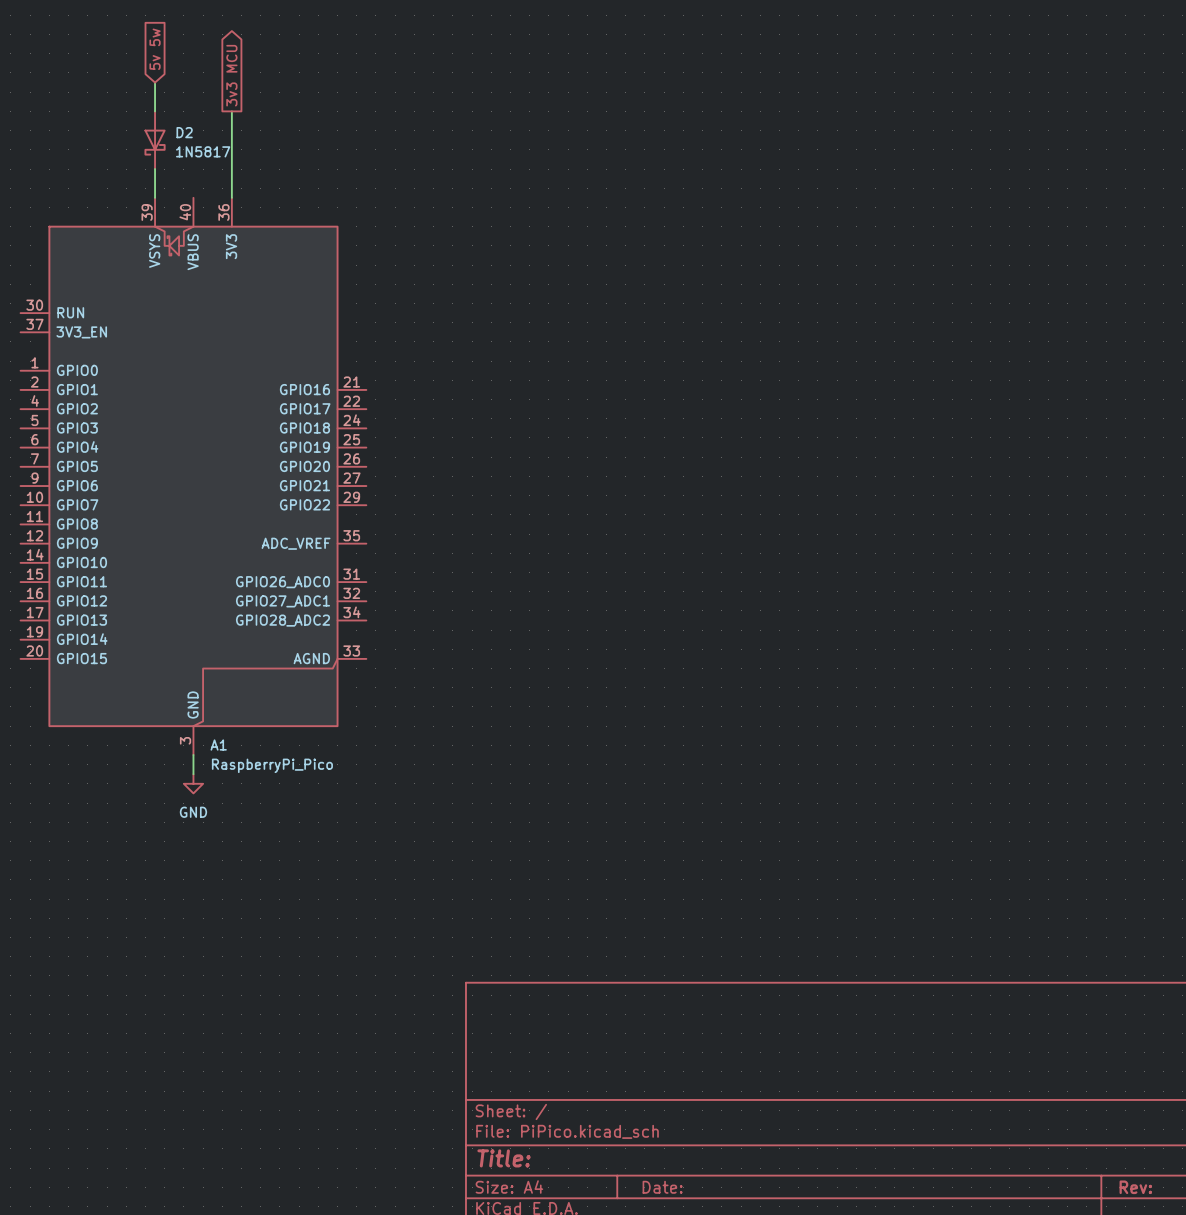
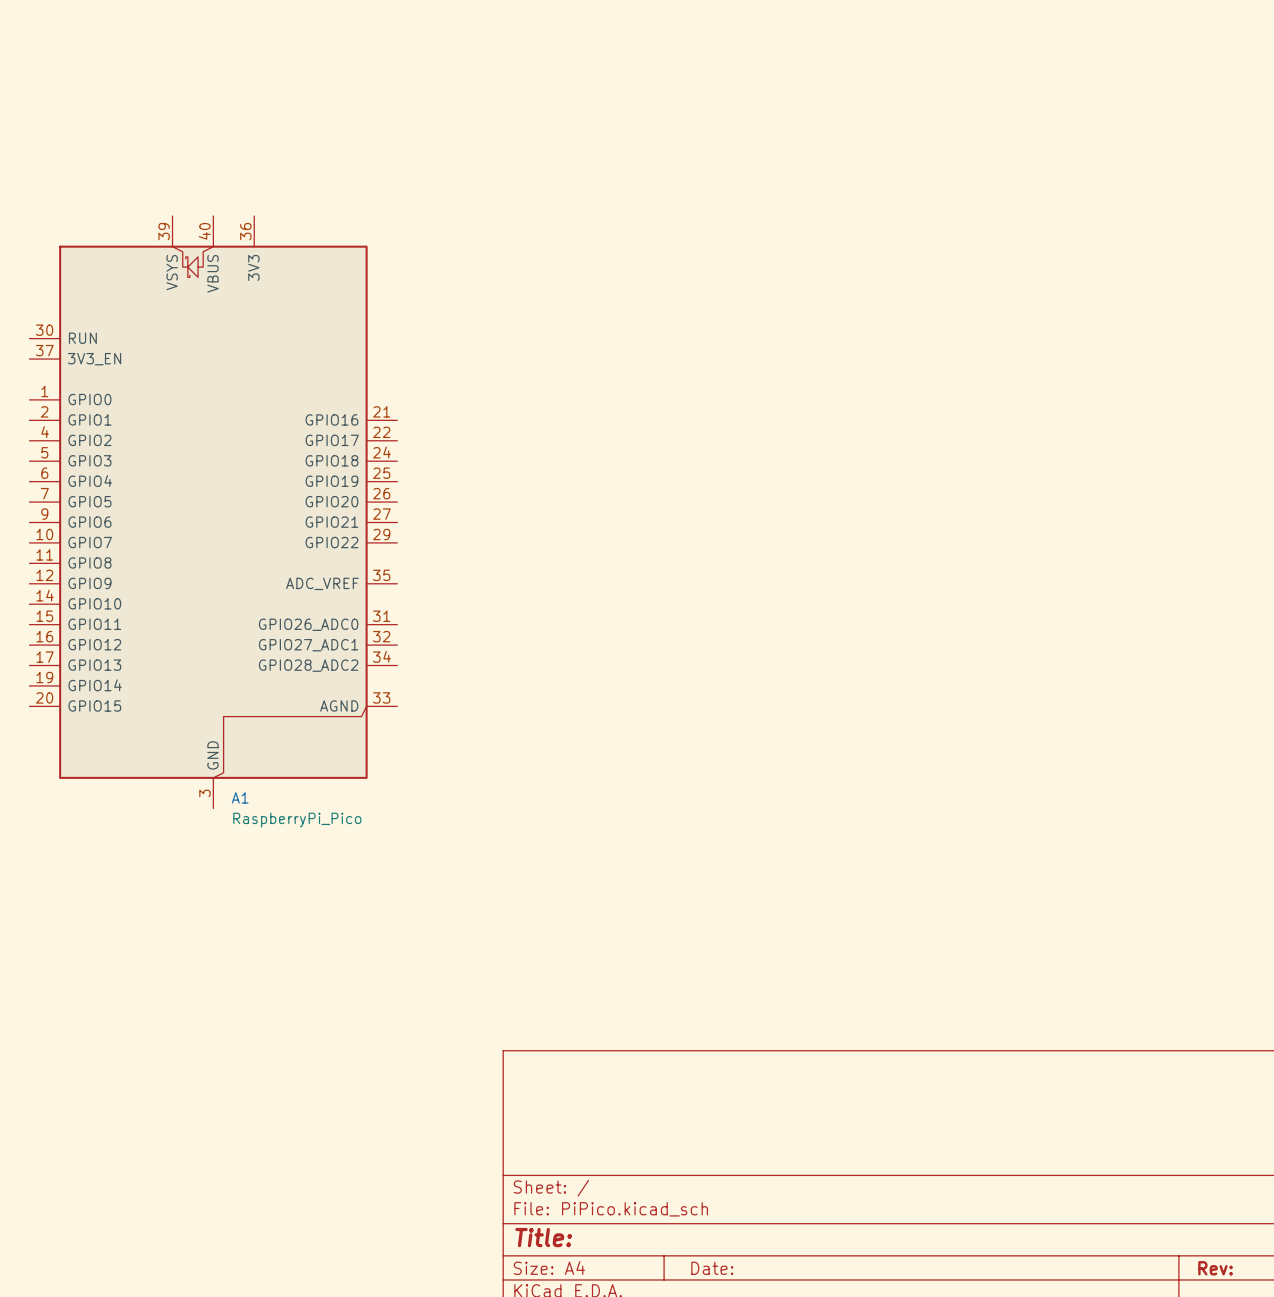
global label: 5v 5w (155, 49) -> none
global label: 3v3 MCU (231, 75) -> none
wire: (155, 82) (155, 111) -> none
wire: (231, 111) (231, 197) -> none
D2: 1N5817 (155, 140) -> none
wire: (155, 169) (155, 197) -> none
wire: (193, 754) (193, 774) -> none
power symbol: GND (193, 783) -> none

